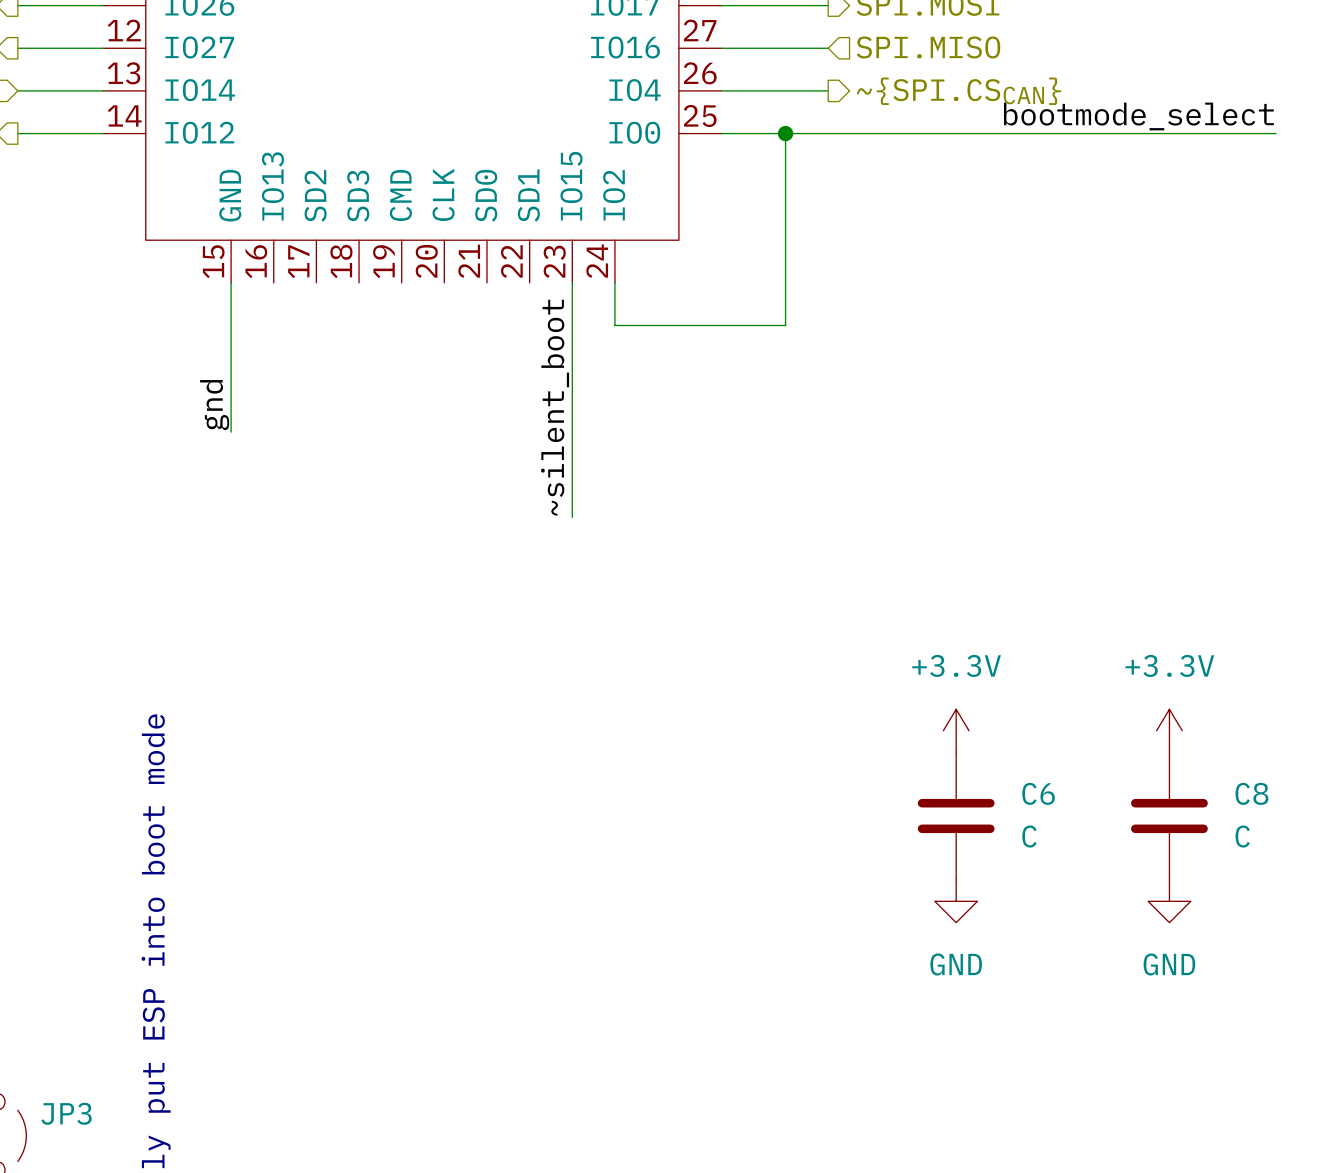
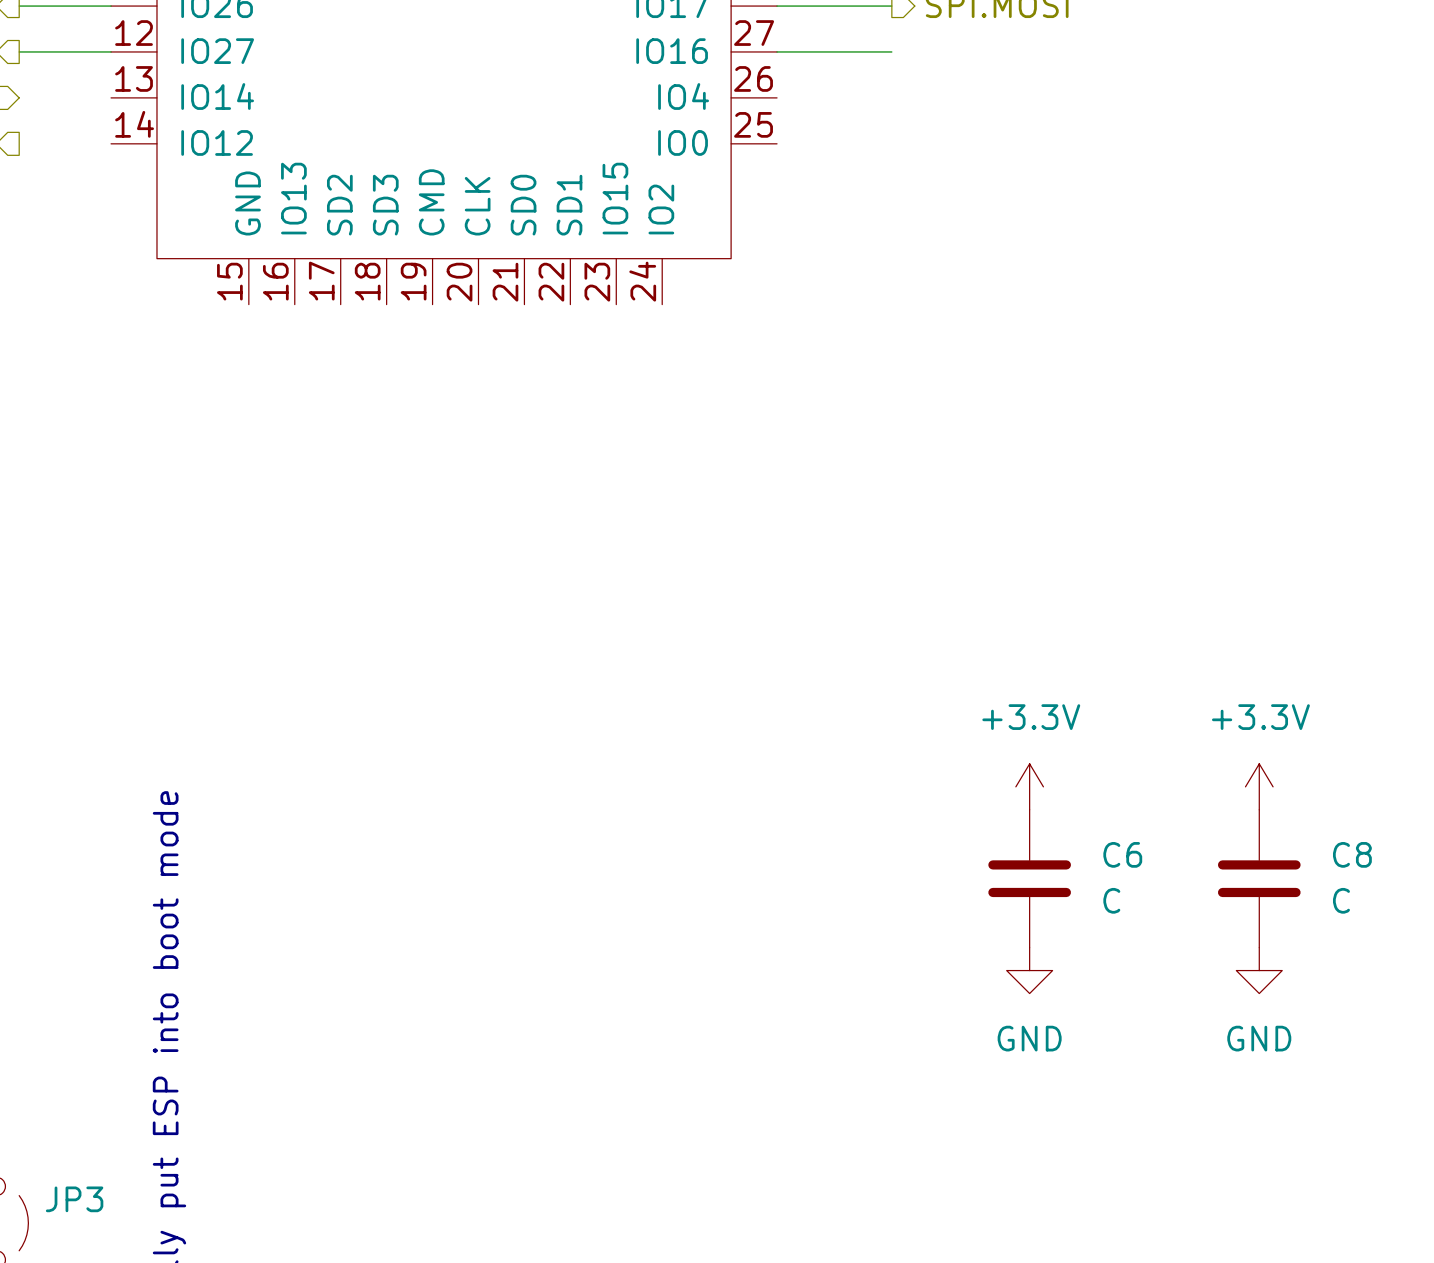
hierarchical label: SPI.MISO (928, 47) -> none
wire: (17, 90) (103, 90) -> none
wire: (721, 90) (828, 90) -> none
hierarchical label: ~{SPI.CSCAN} (958, 91) -> none
label: bootmode_select (1138, 116) -> none
wire: (17, 133) (103, 133) -> none
wire: (721, 133) (1276, 133) -> none
wire: (785, 133) (785, 325) (614, 325) (614, 282) -> none
junction: (785, 133) -> none
wire: (231, 282) (231, 432) -> none
wire: (572, 282) (572, 517) -> none
label: gnd (214, 405) -> none
label: ~silent_boot (555, 407) -> none

